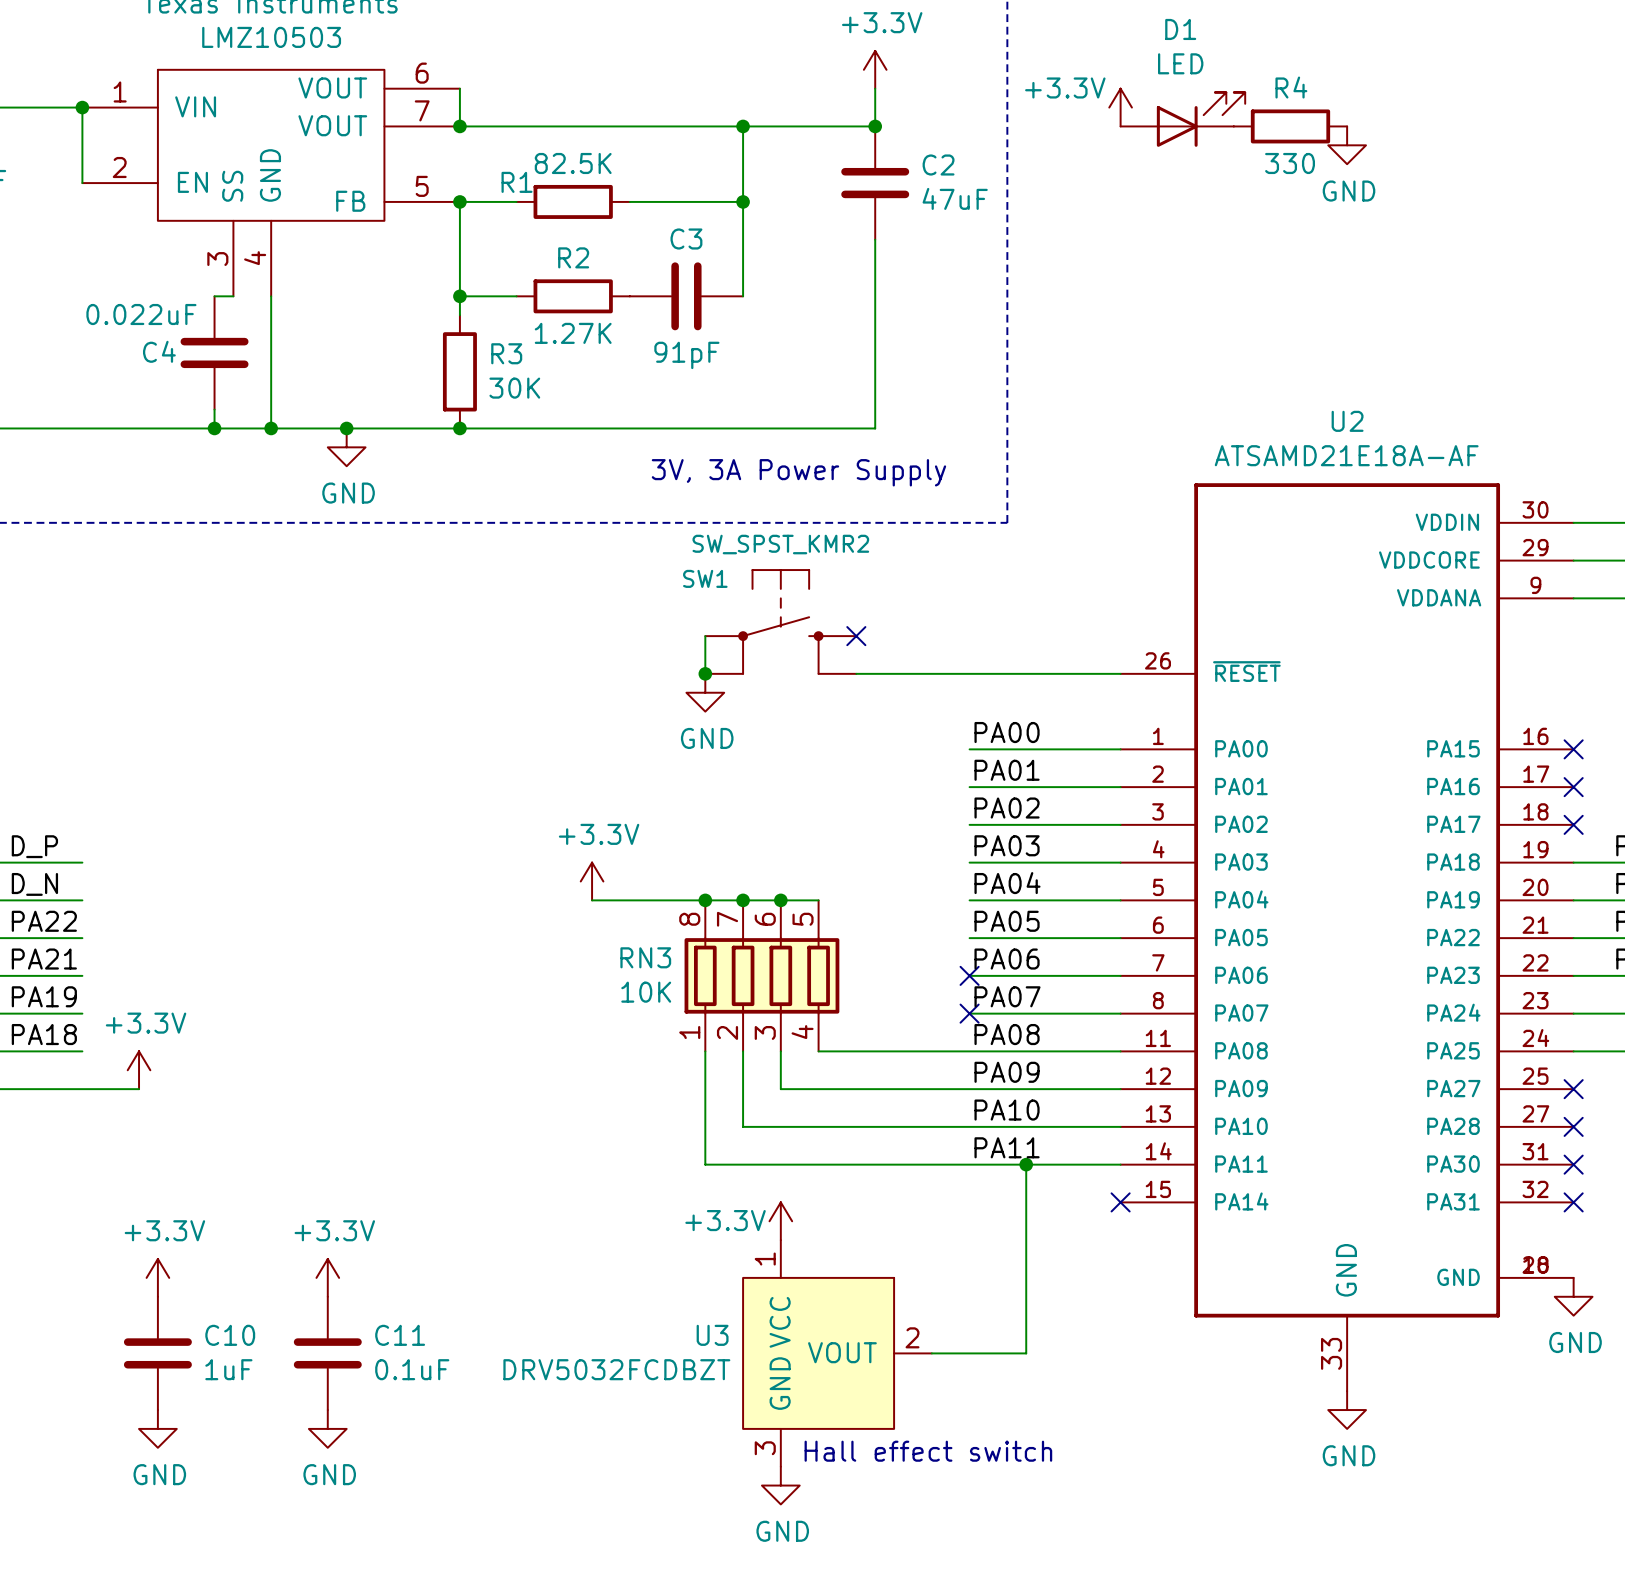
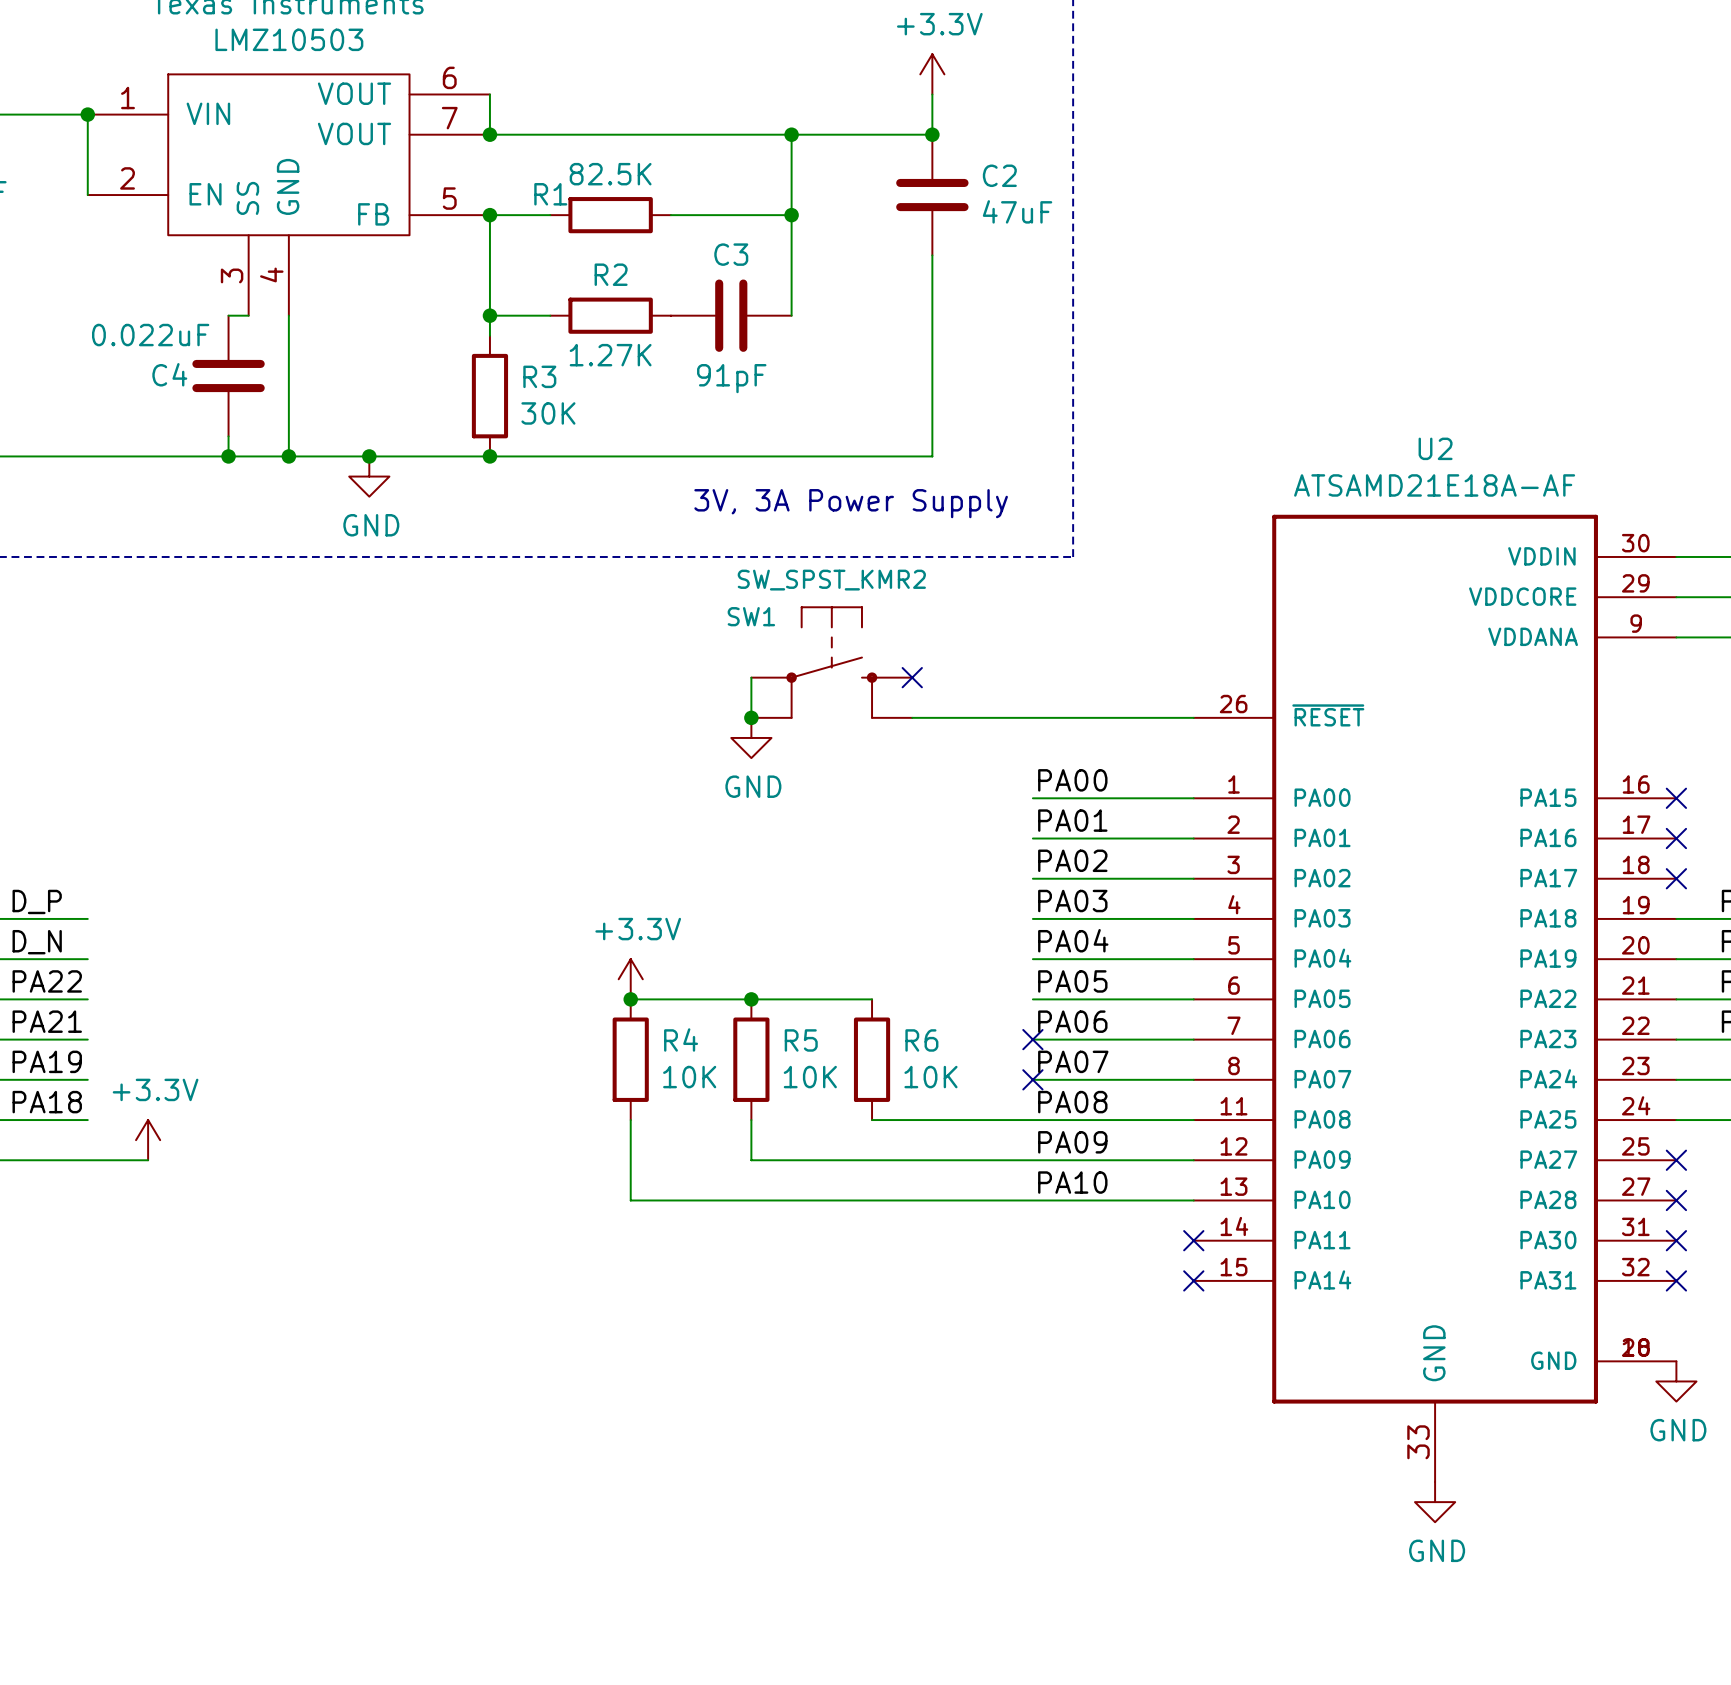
power symbol: +3.3V (1120, 107) -> none
D1: LED (1182, 119) -> none
R4 rotation: 0° (1290, 126) -> 90° clockwise (630, 1059)
R4 position: (1290, 126) -> (630, 1059)
power symbol: GND (1347, 145) -> none
R4 value: 330 (1290, 163) -> 10K (689, 1077)
power symbol position: +3.3V (592, 881) -> +3.3V (630, 979)
wire: (592, 900) (818, 900) -> (630, 999) (872, 999)
junction: (705, 900) -> none
junction: (743, 900) -> none
junction: (780, 900) -> none
junction: none -> (630, 999)
junction: none -> (751, 999)
RN3: 10K (761, 975) -> none
R5: none -> 10K (751, 1059)
R6: none -> 10K (872, 1059)
wire: (743, 1051) (743, 1126) -> (630, 1120) (630, 1200) (791, 1200)
wire: (780, 1051) (780, 1089) -> (751, 1160) (831, 1160)
wire: (705, 1089) (705, 1164) (1120, 1164) -> none
label: PA11 (1007, 1147) -> none
wire: (1026, 1164) (1026, 1353) (931, 1353) -> none
junction: (1026, 1164) -> none
no-connect mark: none -> (1193, 1240)
power symbol: +3.3V (780, 1221) -> none
power symbol: +3.3V (157, 1277) -> none
power symbol: +3.3V (327, 1277) -> none
C10: 1uF (157, 1353) -> none
C11: 0.1uF (327, 1353) -> none
U3: DRV5032FCDBZT (837, 1353) -> none
power symbol: GND (157, 1428) -> none
power symbol: GND (327, 1428) -> none
text: Hall effect switch (928, 1451) -> none
power symbol: GND (780, 1485) -> none

